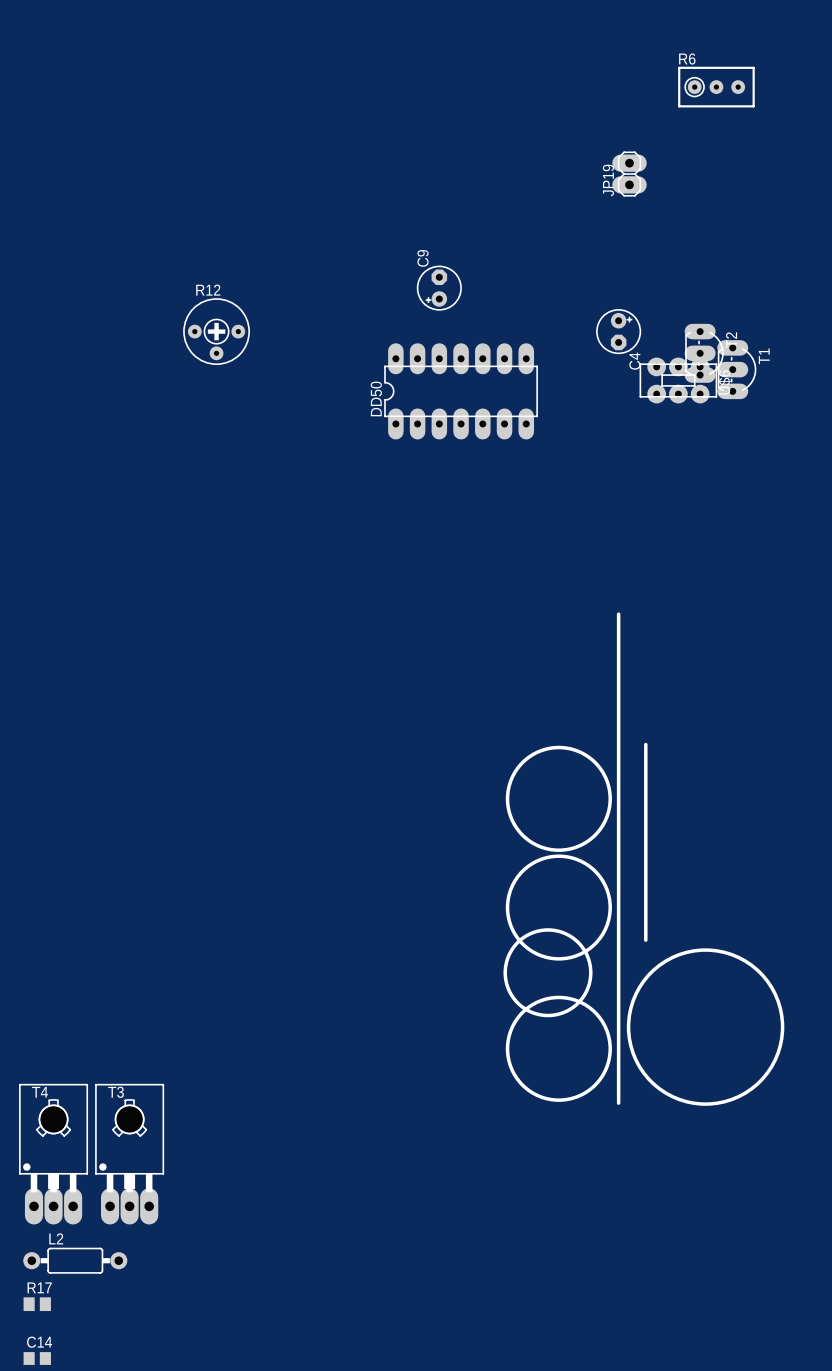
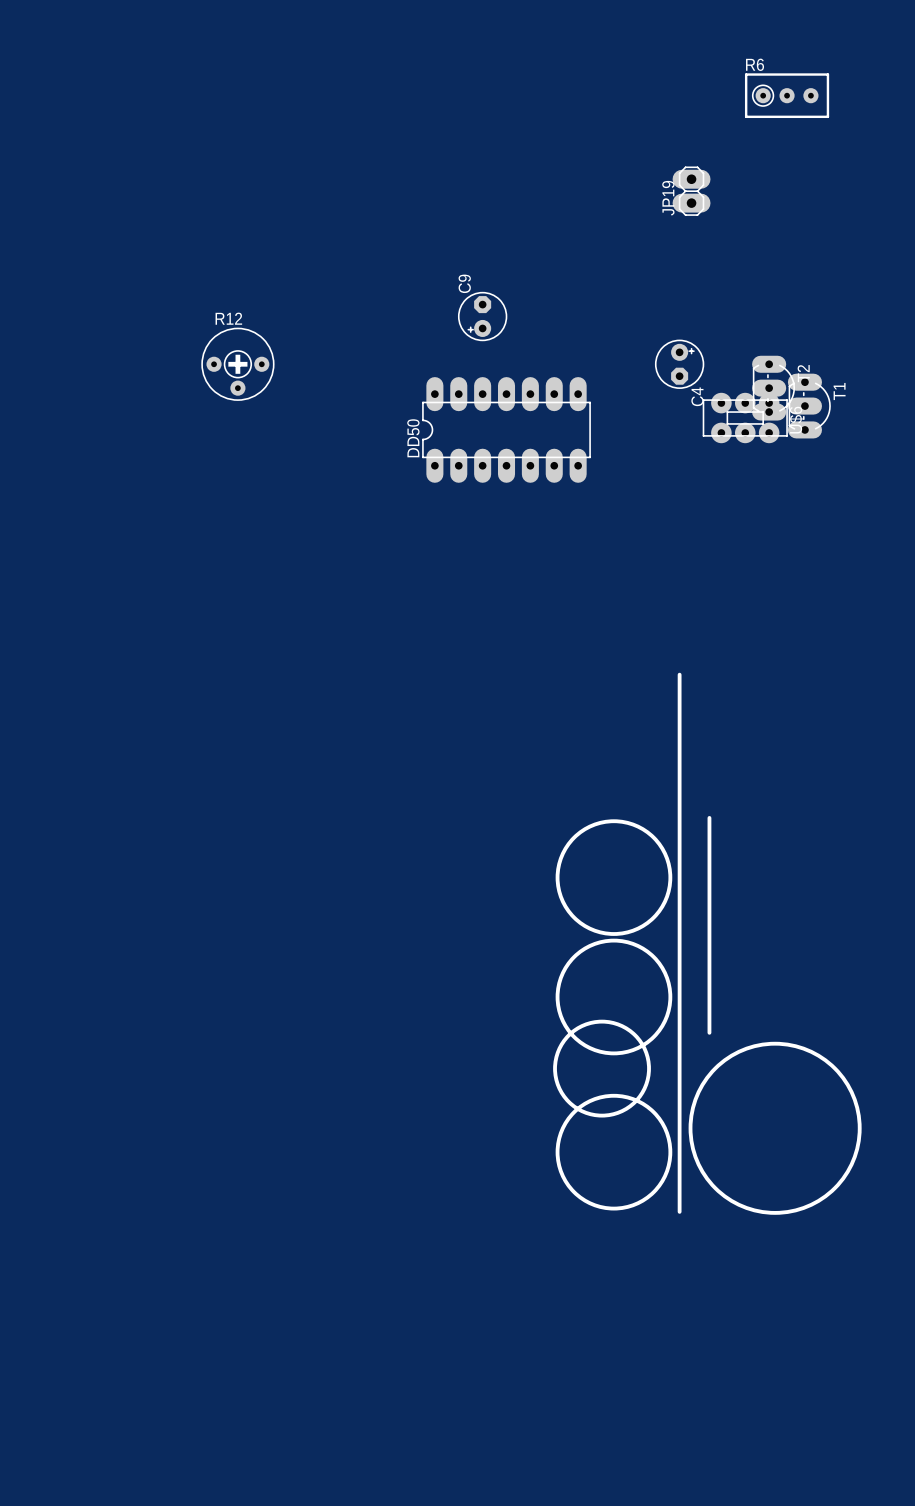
T4: (53, 1154) -> none
T3: (129, 1154) -> none
L2: (75, 1260) -> none
R17: (37, 1304) -> none
C14: (37, 1358) -> none

